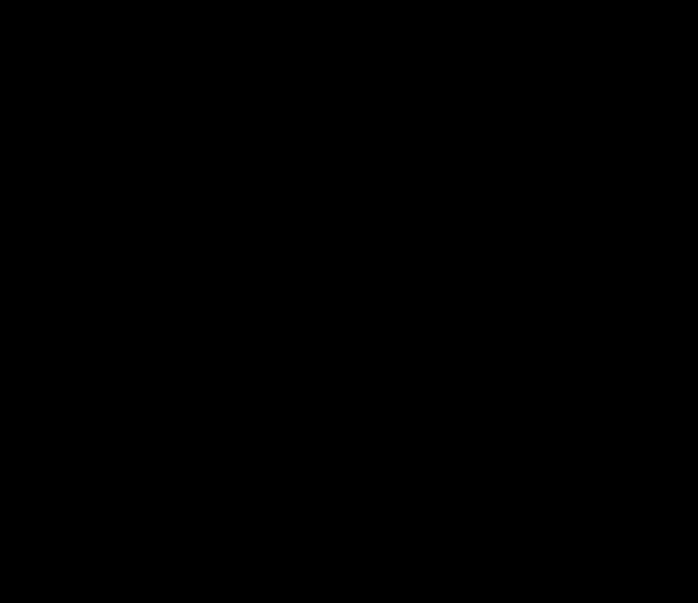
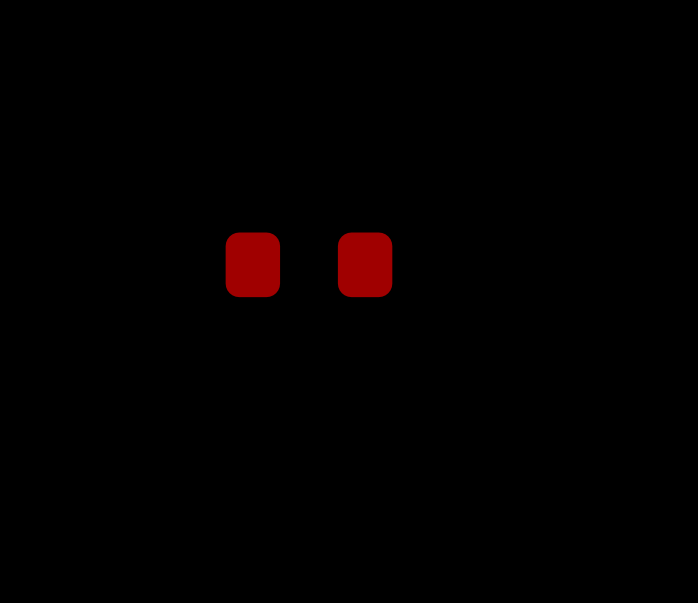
part: none -> (308, 264)

